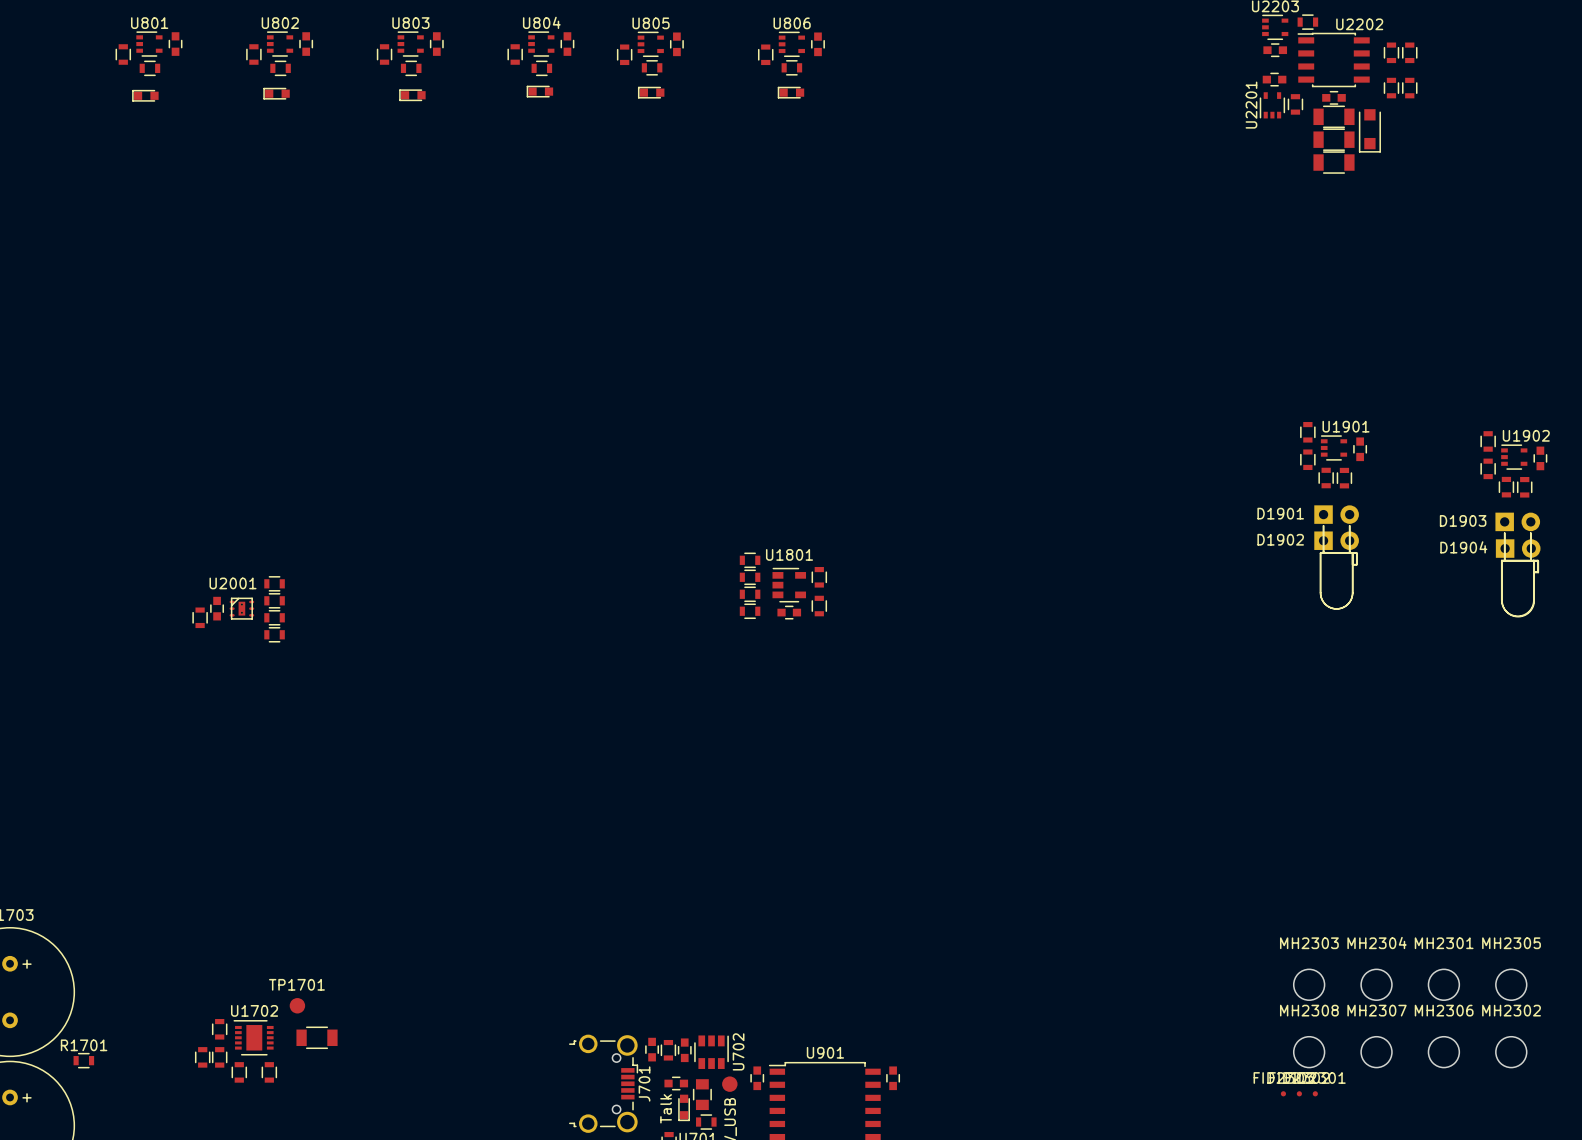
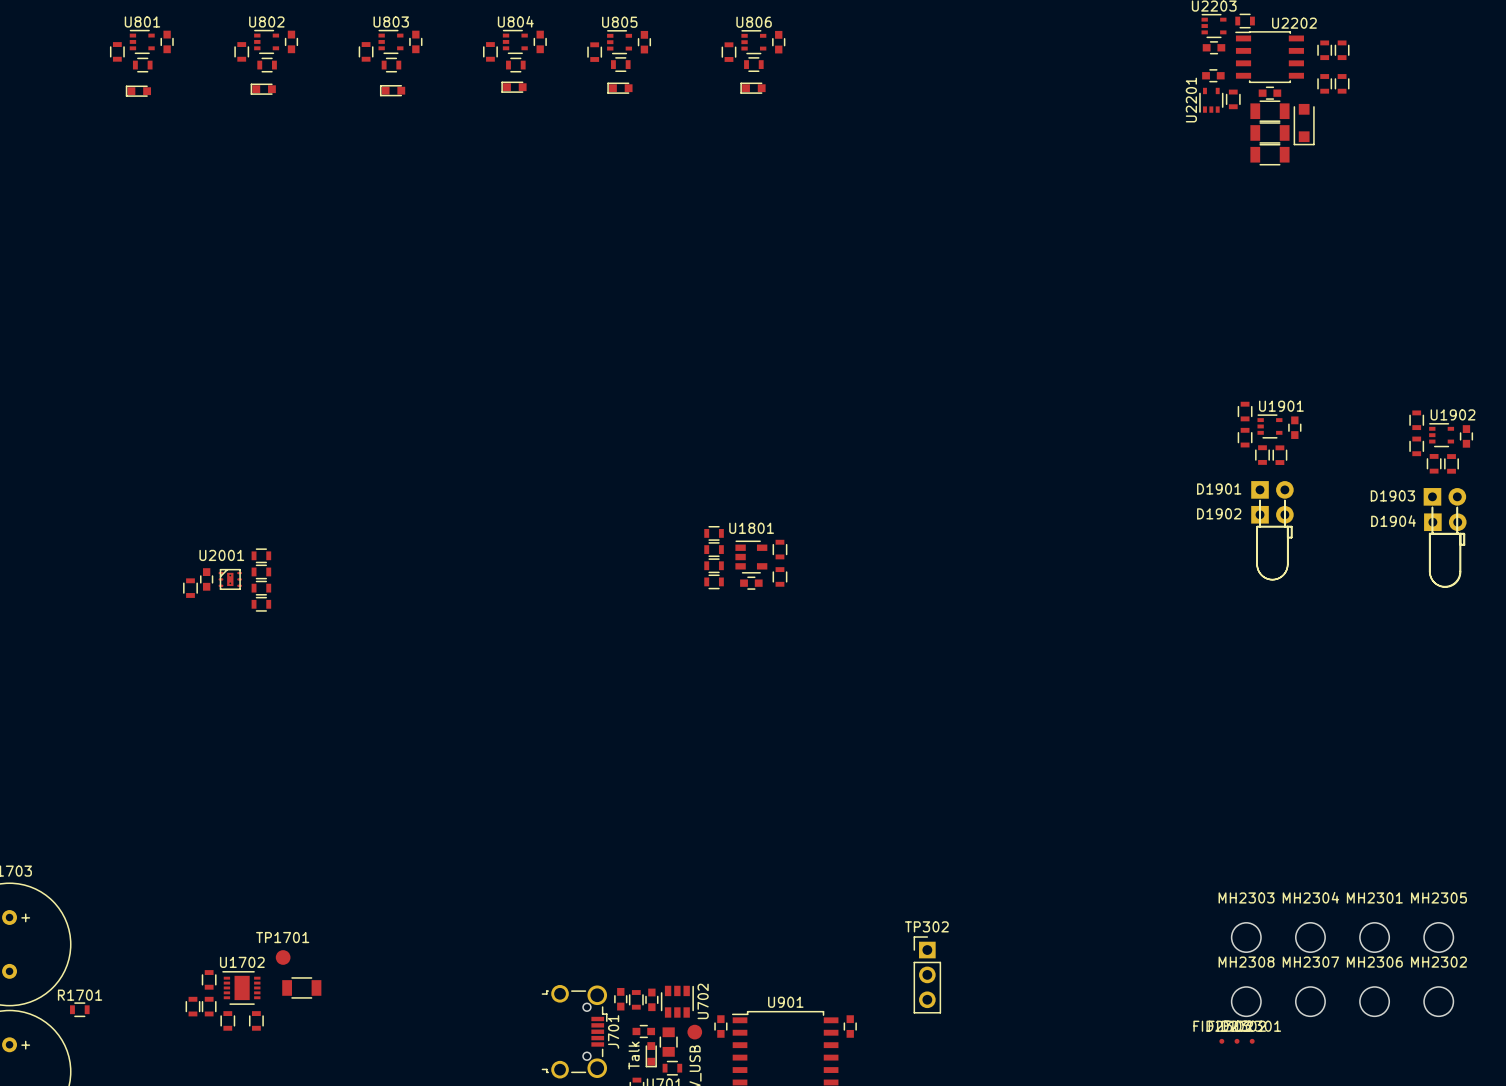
TP302: none -> (927, 974)

